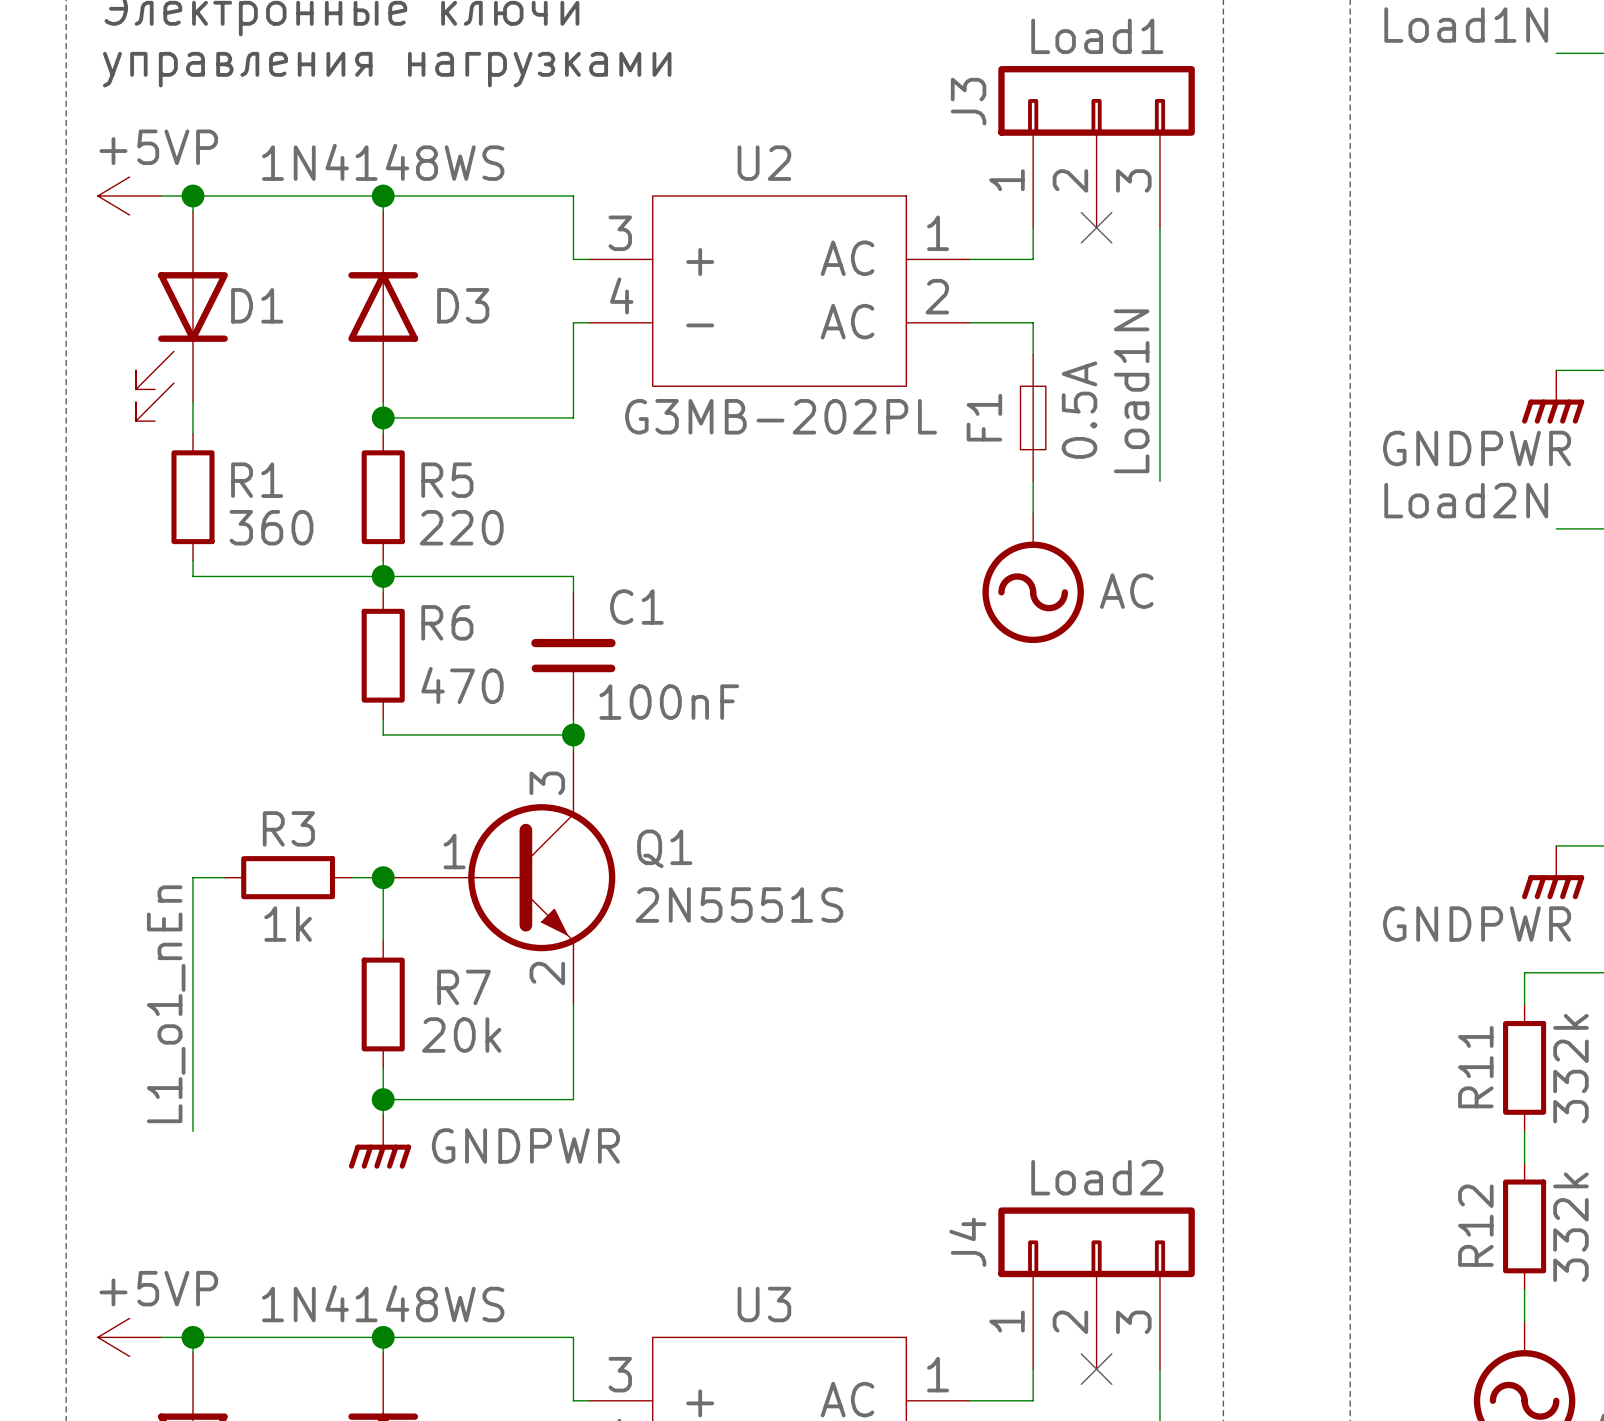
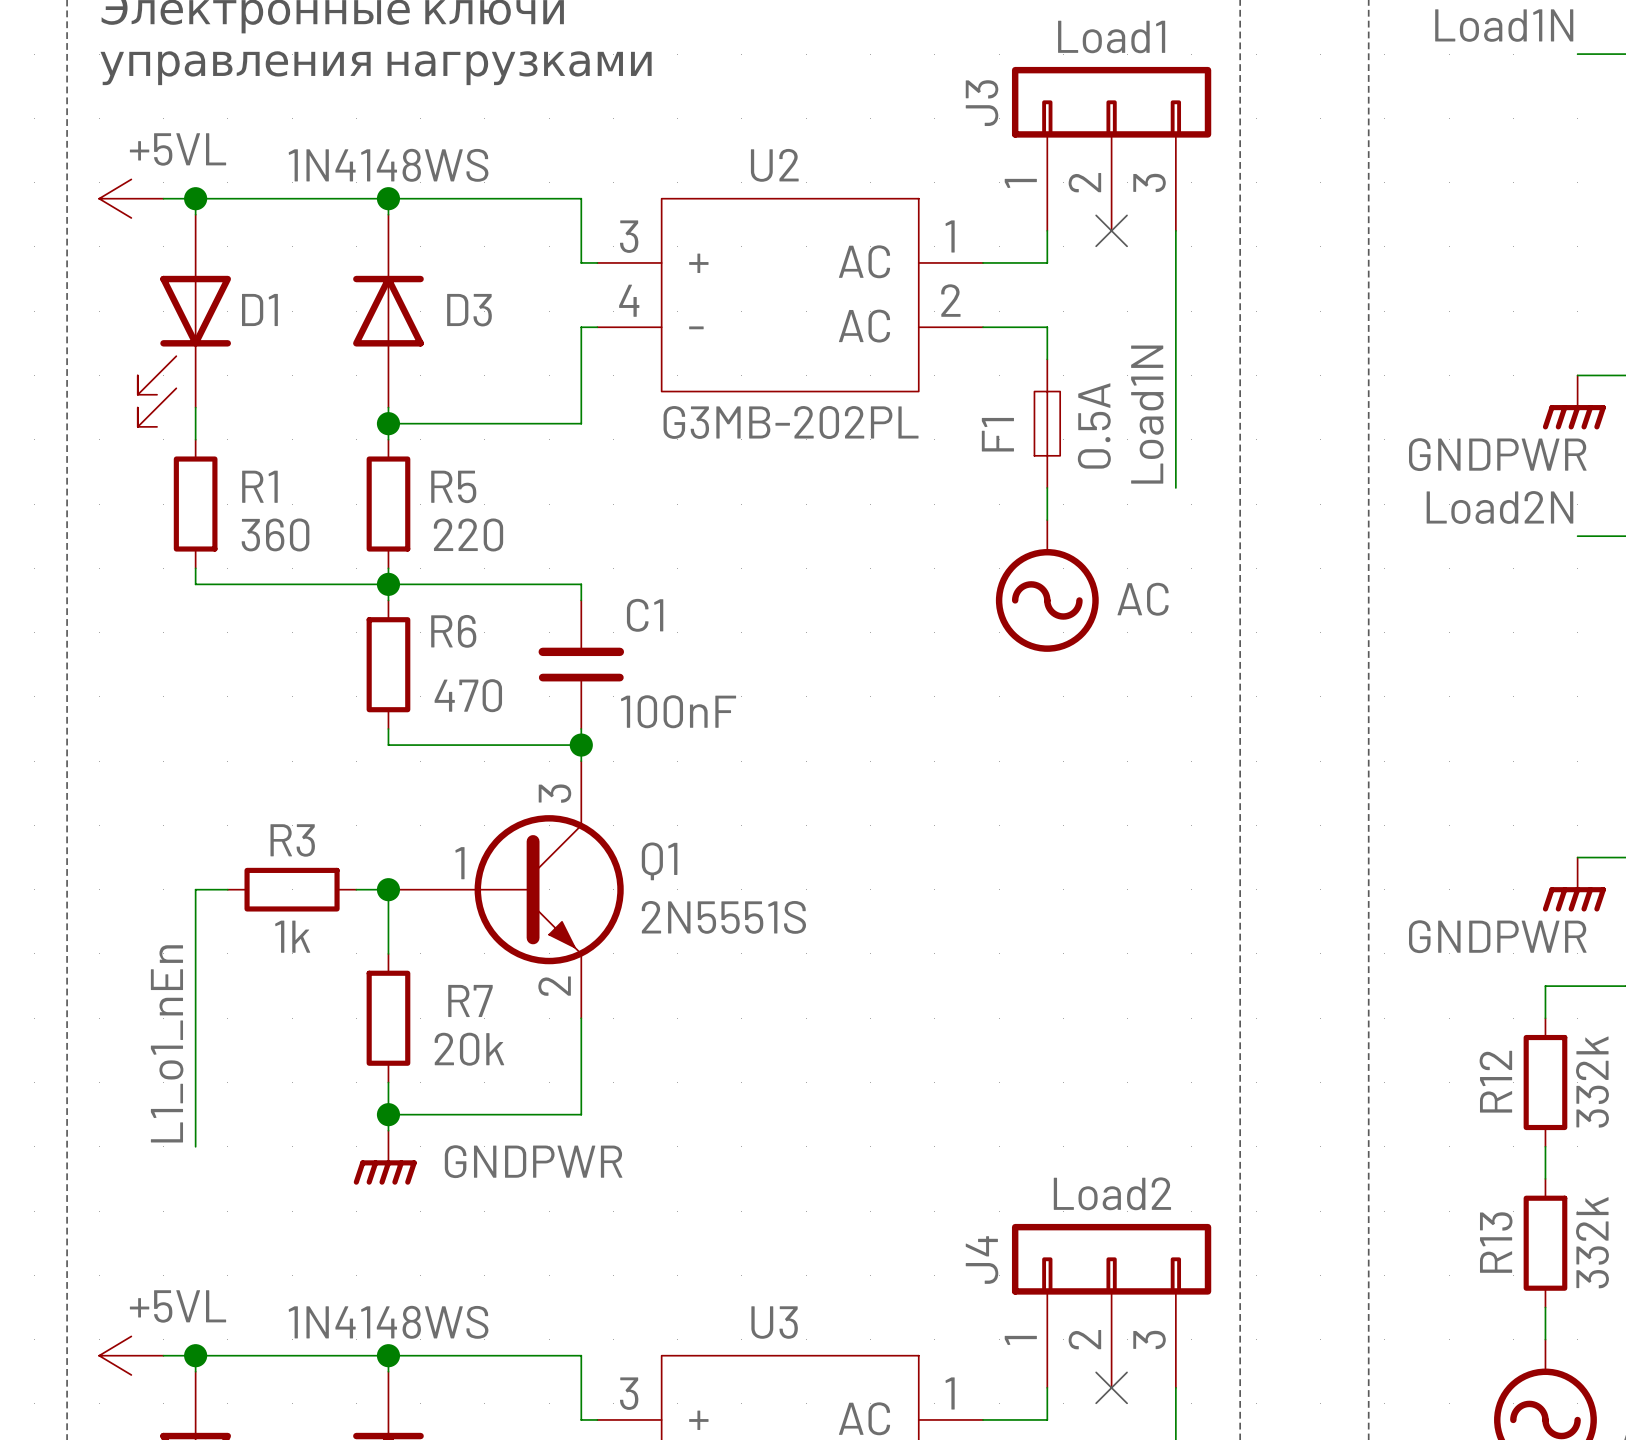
power symbol: +5VP (129, 196) -> +5VL (131, 198)
R11 name: R11 (1475, 1067) -> R12 (1495, 1081)
R12 name: R12 (1475, 1225) -> R13 (1496, 1242)
power symbol: +5VP (129, 1337) -> +5VL (131, 1355)

